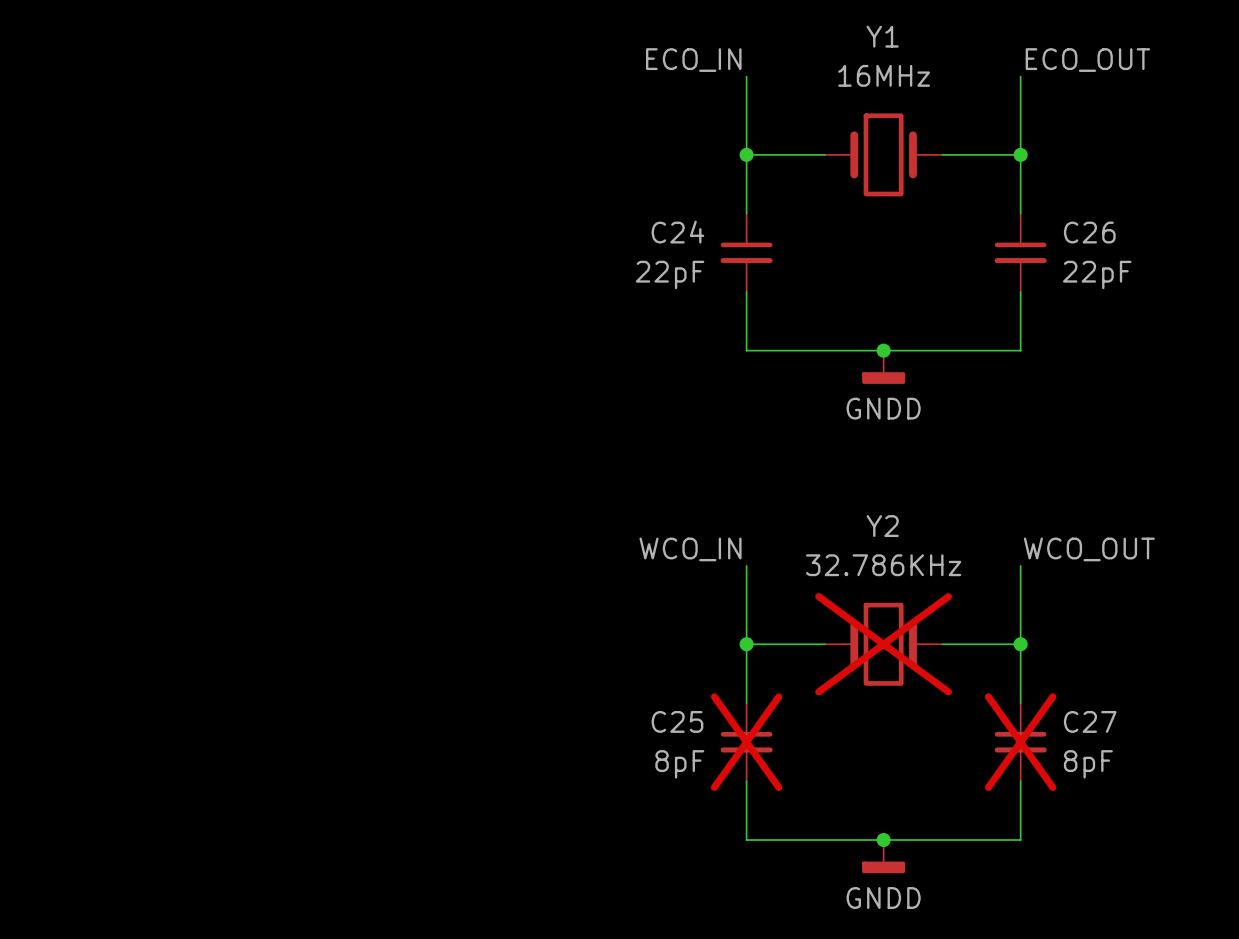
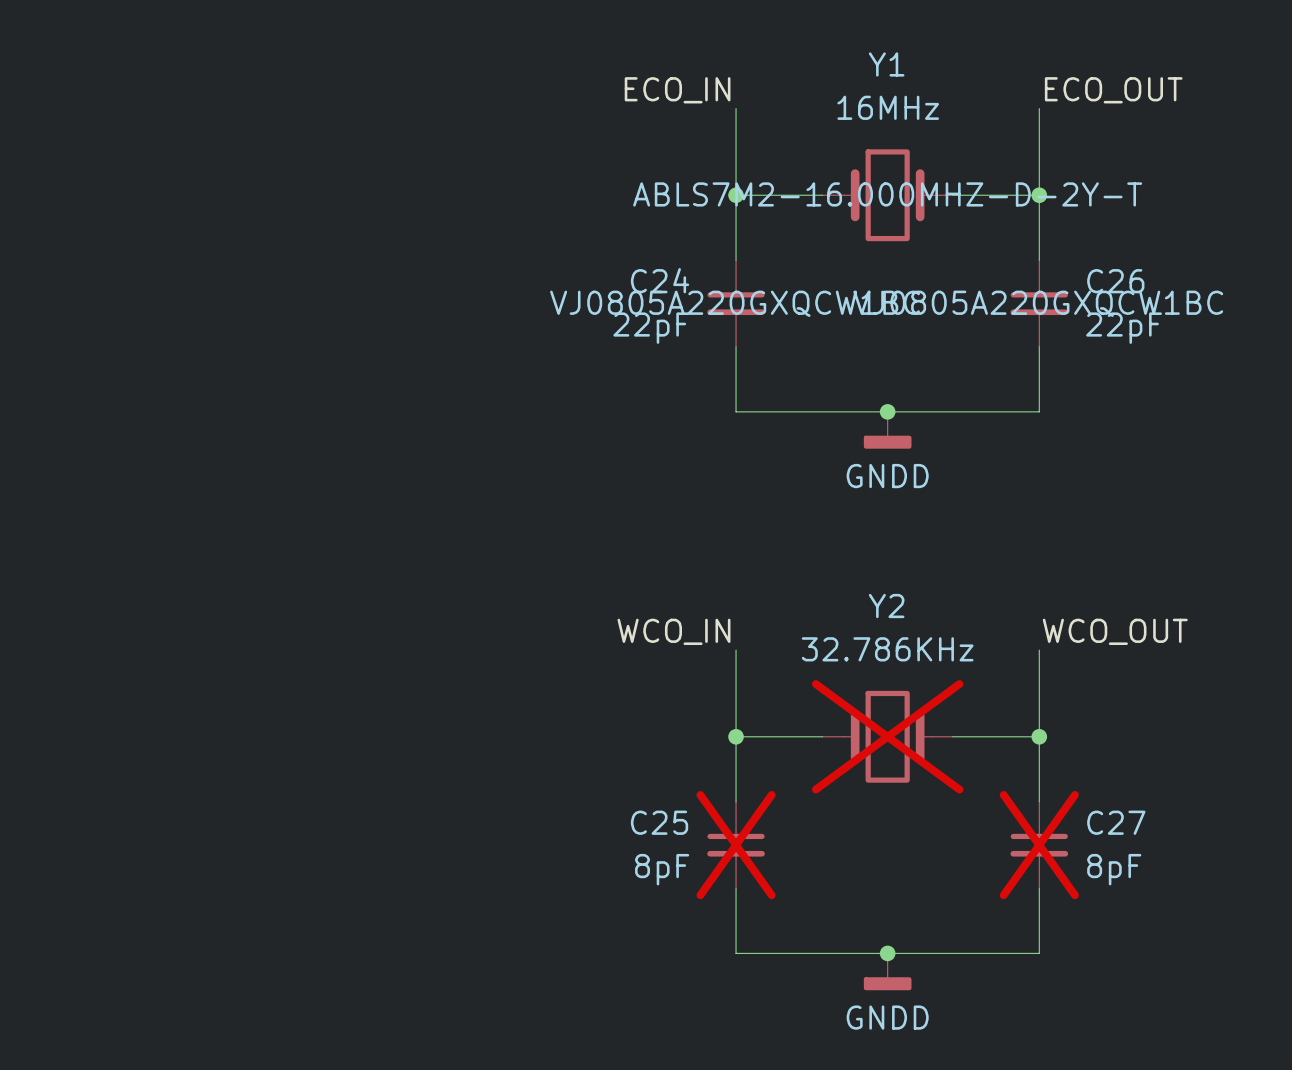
Y1 text: none -> ABLS7M2-16.000MHZ-D-2Y-T (887, 194)
C24 text: none -> VJ0805A220GXQCW1BC (735, 303)
C26 text: none -> VJ0805A220GXQCW1BC (1038, 303)

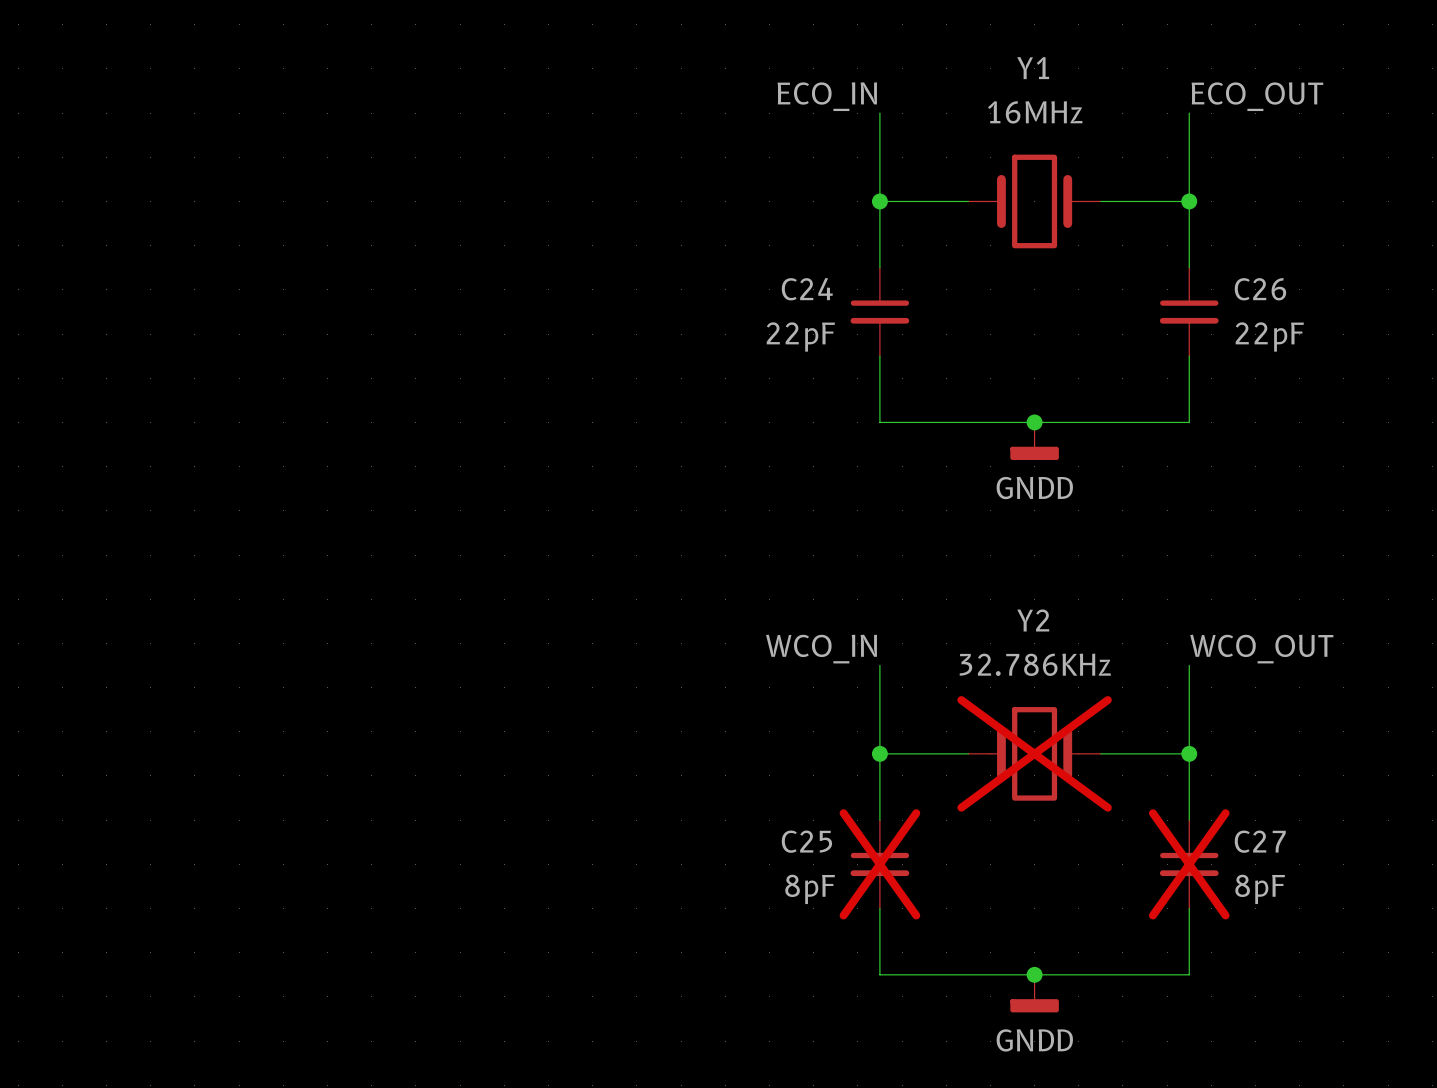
Y1 text: ABLS7M2-16.000MHZ-D-2Y-T (887, 194) -> none
C24 text: VJ0805A220GXQCW1BC (735, 303) -> none
C26 text: VJ0805A220GXQCW1BC (1038, 303) -> none

